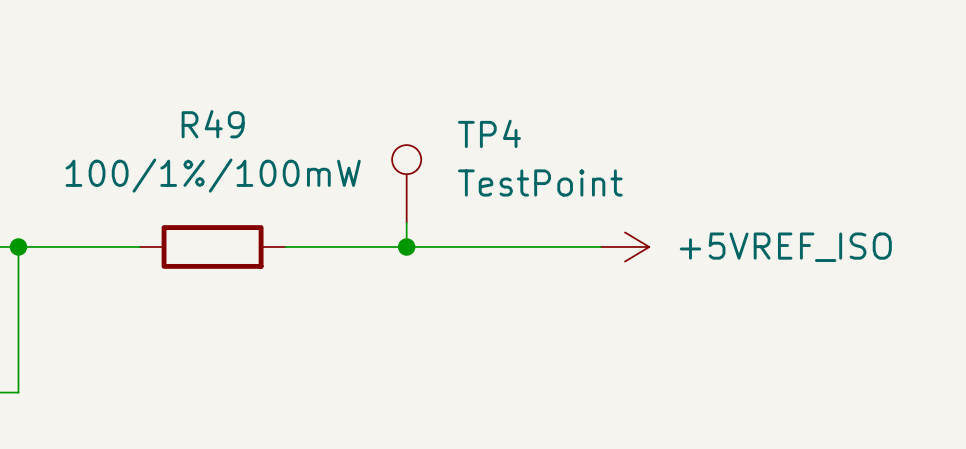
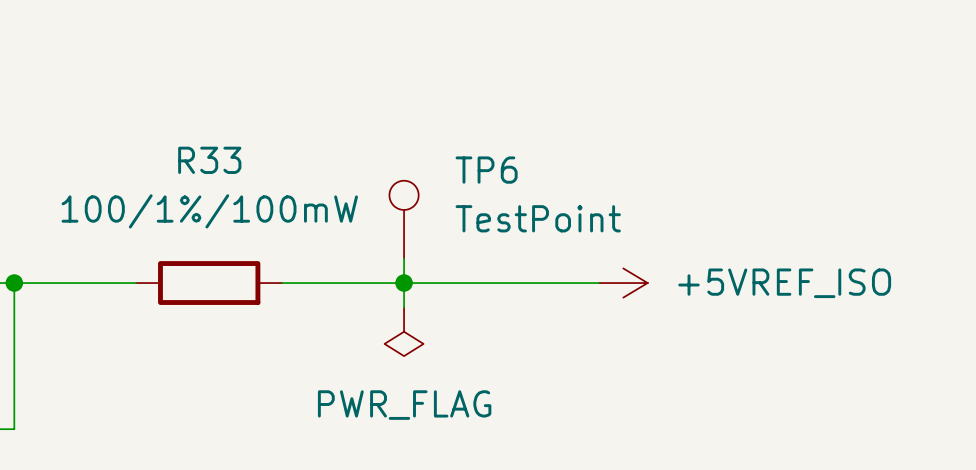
R49 name: R49 (213, 124) -> R33 (209, 160)
TP4 name: TP4 (489, 133) -> TP6 (486, 170)
wire: none -> (404, 283) (404, 307)
power symbol: none -> PWR_FLAG (404, 331)

